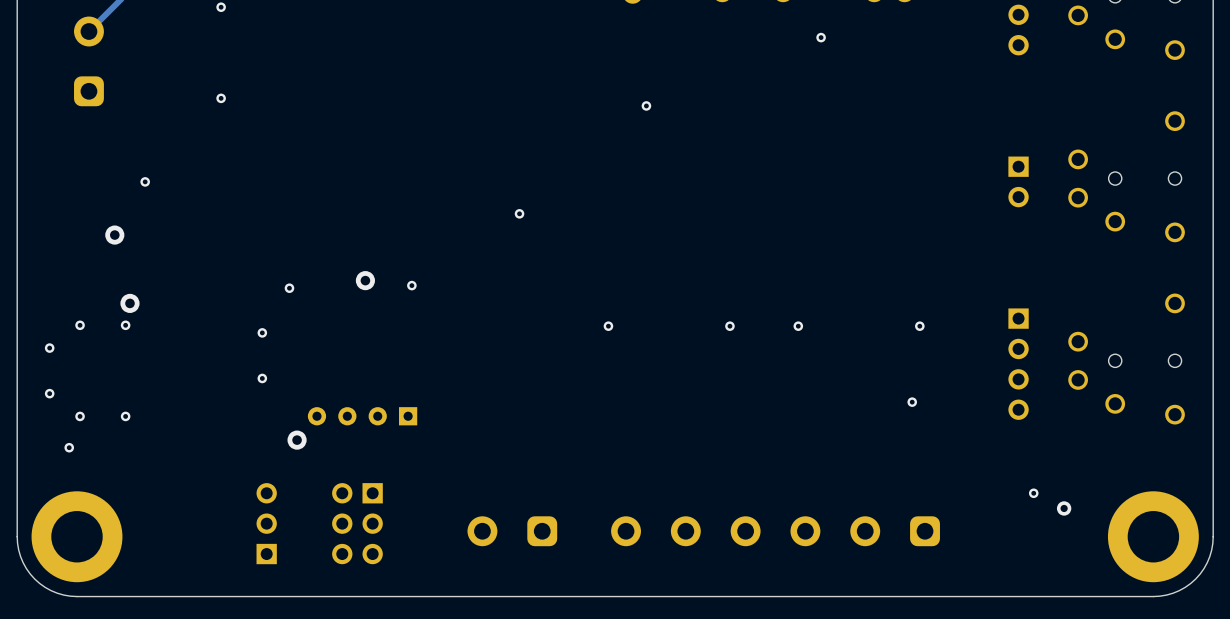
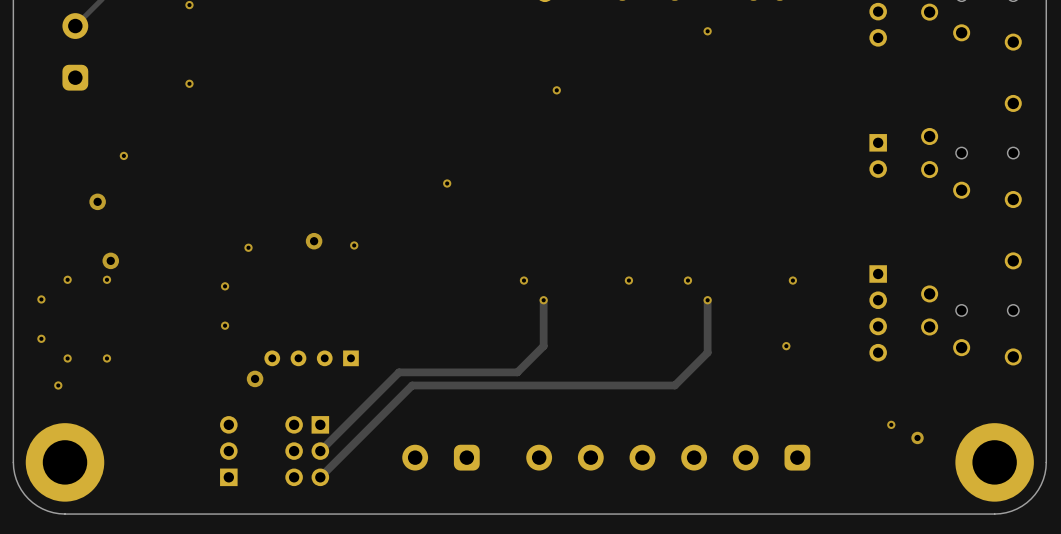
track: none -> (543, 300) (543, 346) (517, 372) (399, 372) (320, 451)
via: none -> (543, 300)
track: none -> (707, 300) (707, 352) (674, 385) (412, 385) (320, 477)
via: none -> (707, 300)

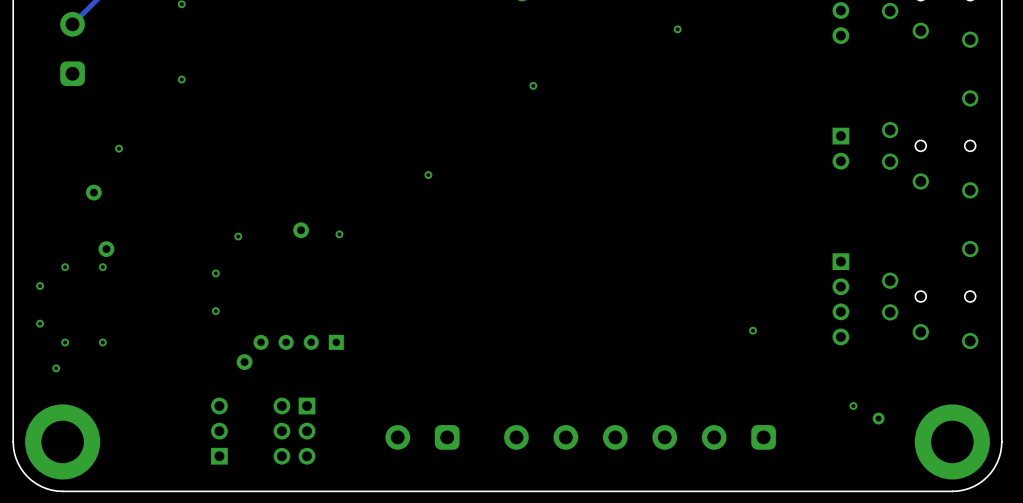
via: (523, 280) -> none
via: (628, 280) -> none
via: (687, 280) -> none
via: (792, 280) -> none
track: (543, 300) (543, 346) (517, 372) (399, 372) (320, 451) -> none
via: (543, 300) -> none
track: (707, 300) (707, 352) (674, 385) (412, 385) (320, 477) -> none
via: (707, 300) -> none

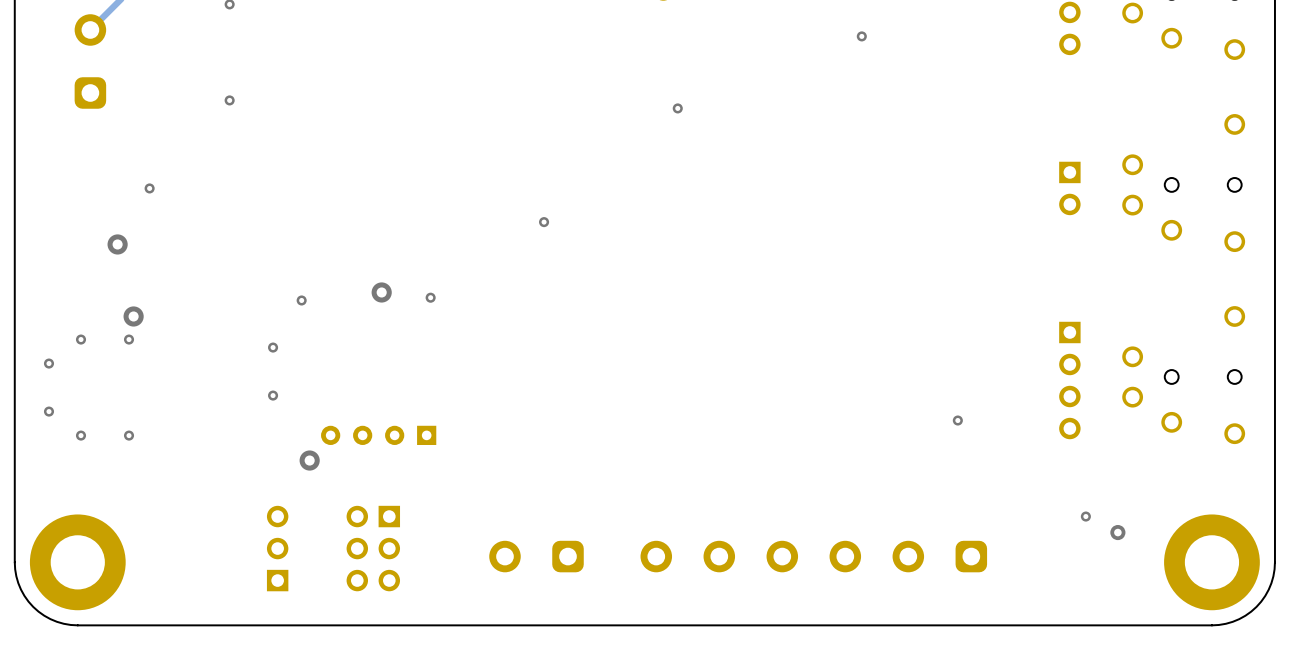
via: (56, 368) -> none

